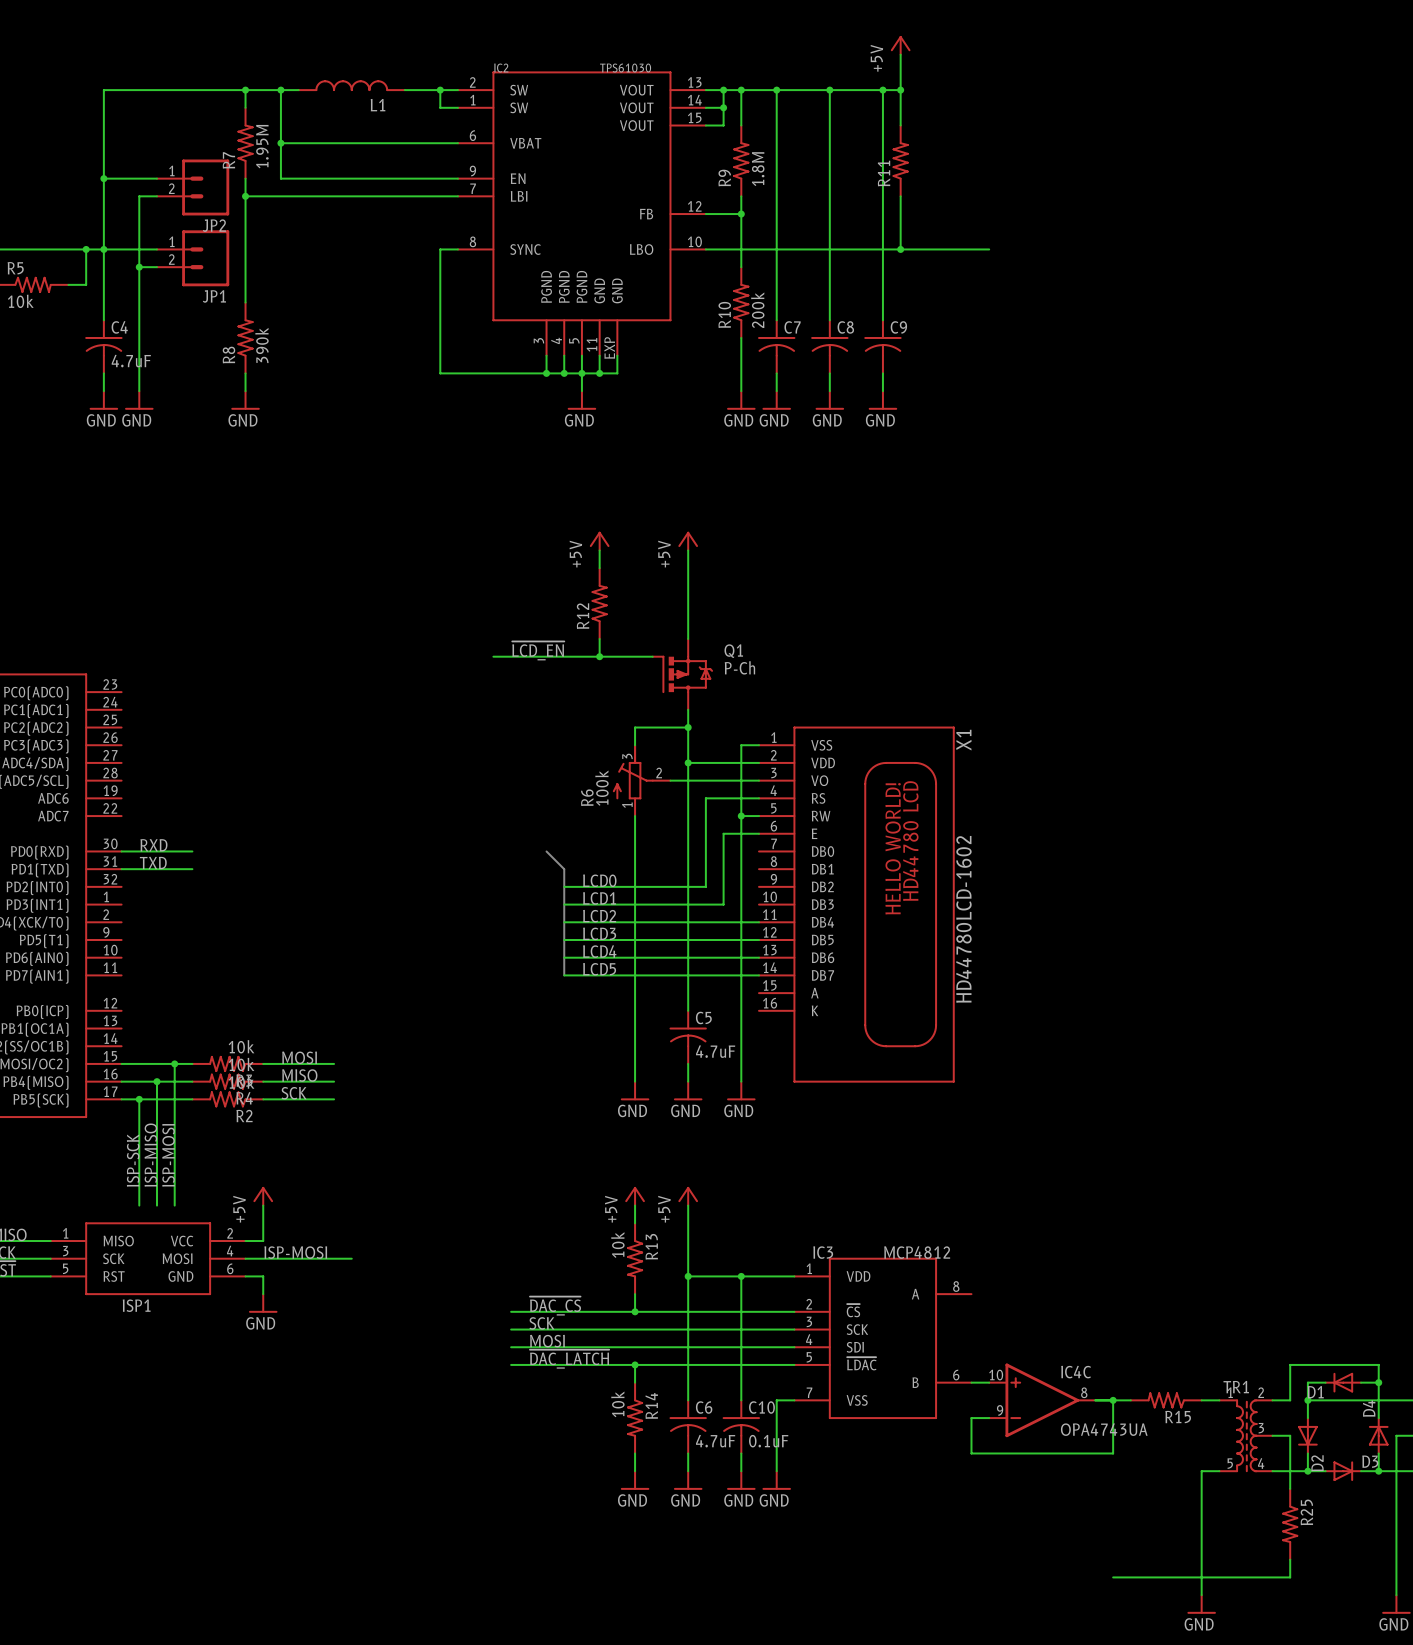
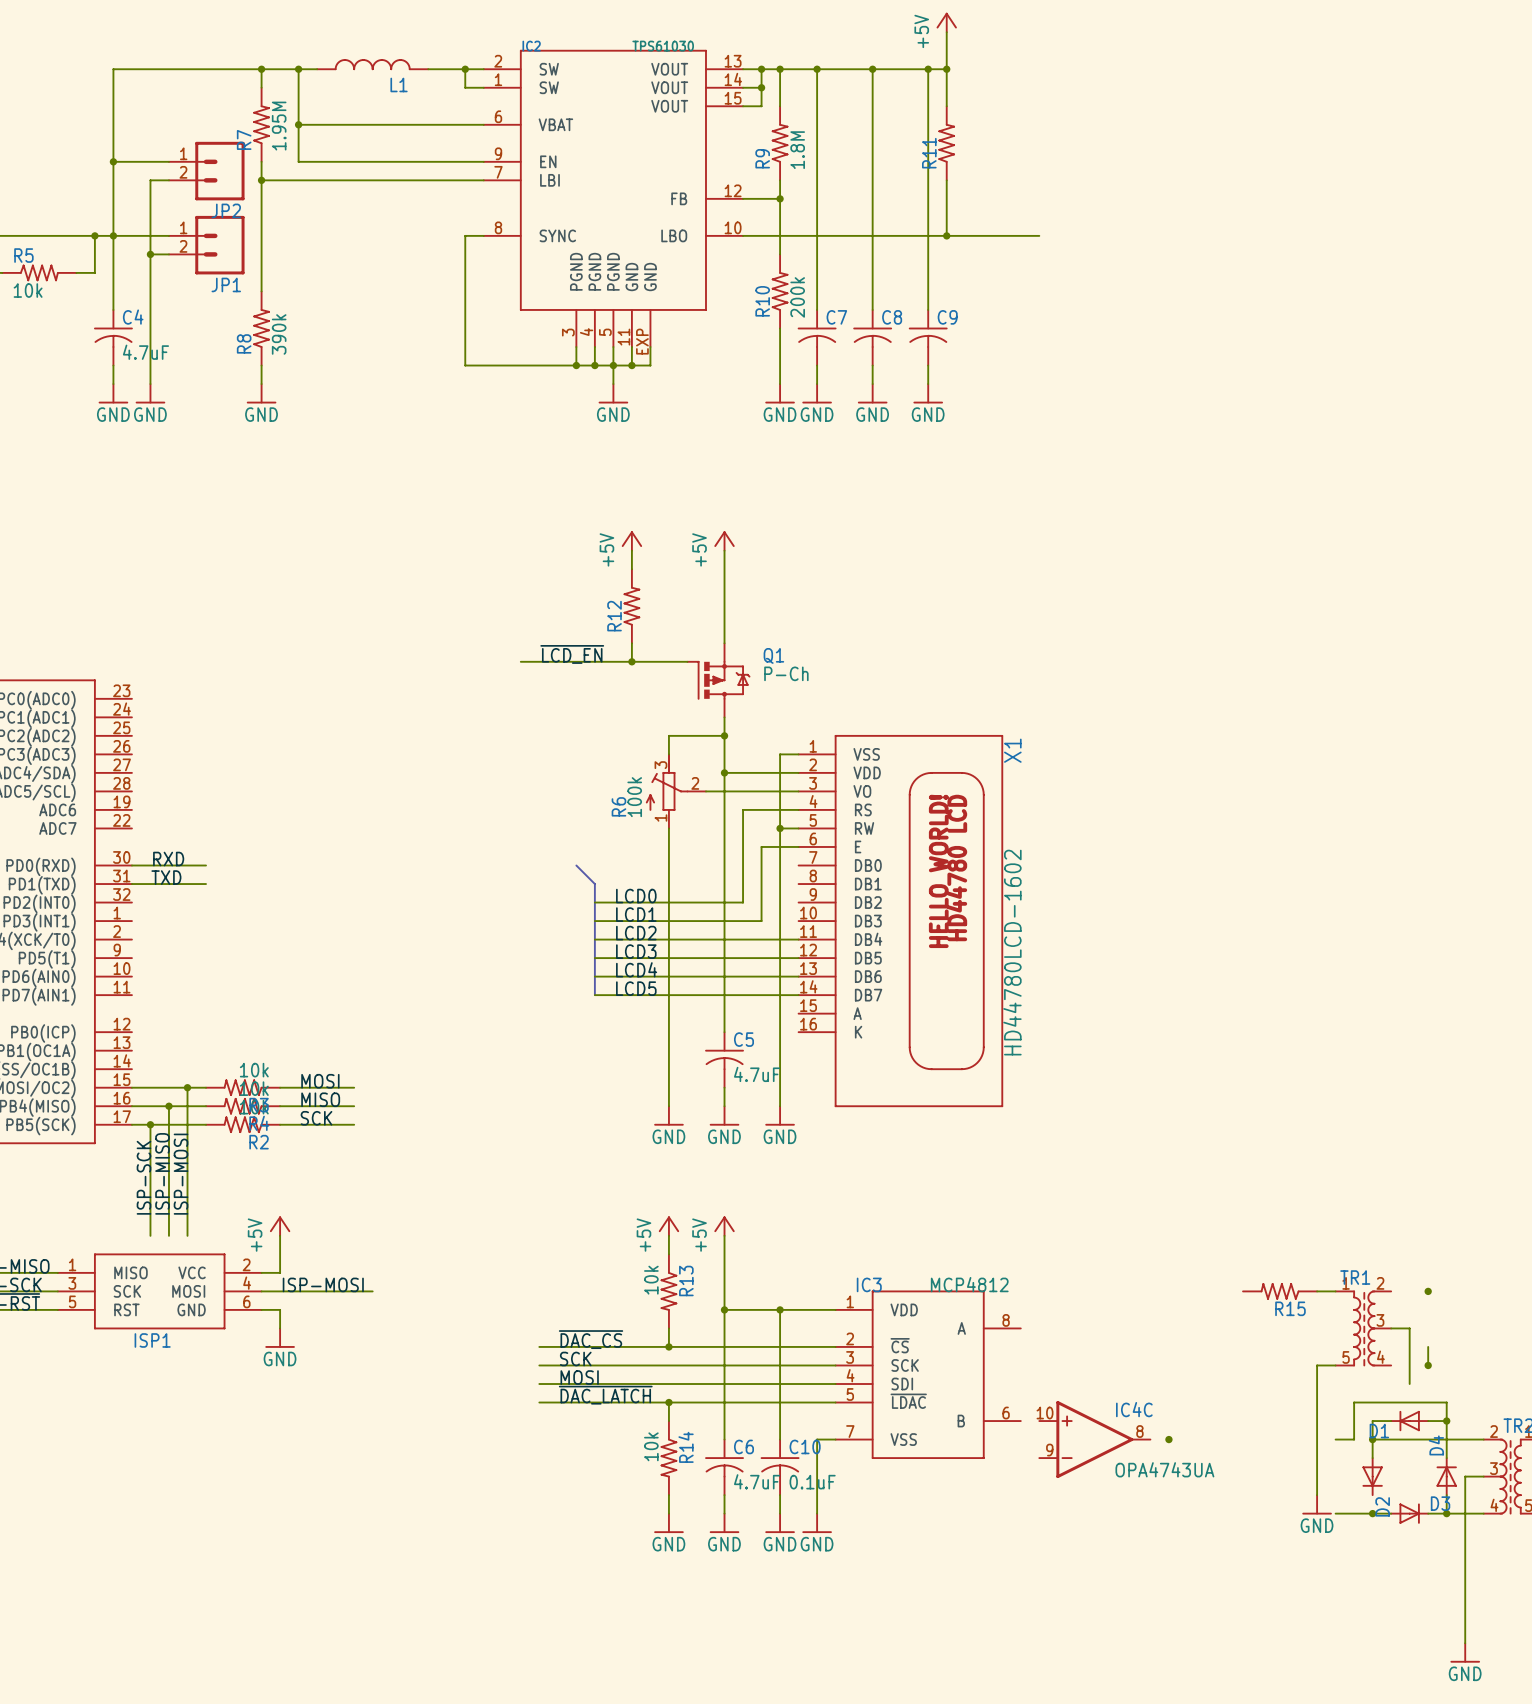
junction: none -> (1428, 1291)
junction: none -> (1428, 1365)
wire: (971, 1382) (989, 1382) -> none
wire: (1095, 1400) (1130, 1400) -> none
wire: (1113, 1400) (1113, 1453) (971, 1453) (971, 1418) (989, 1418) -> none
R15 position: (1166, 1400) -> (1280, 1291)
wire: (1201, 1400) (1219, 1400) -> (1317, 1291) (1335, 1291)
TR1 position: (1245, 1435) -> (1363, 1328)
wire: (1272, 1435) (1290, 1435) (1290, 1488) -> (1391, 1328) (1409, 1328) (1409, 1384)
wire: (1307, 1453) (1307, 1471) -> (1428, 1346) (1428, 1365)
power symbol: none -> GND (1317, 1504)
wire: (1219, 1471) (1201, 1471) (1201, 1595) -> (1335, 1365) (1317, 1365) (1317, 1495)
R25: (1290, 1524) -> none
wire: (1290, 1559) (1290, 1577) (1113, 1577) -> none
power symbol: GND (1201, 1604) -> none

